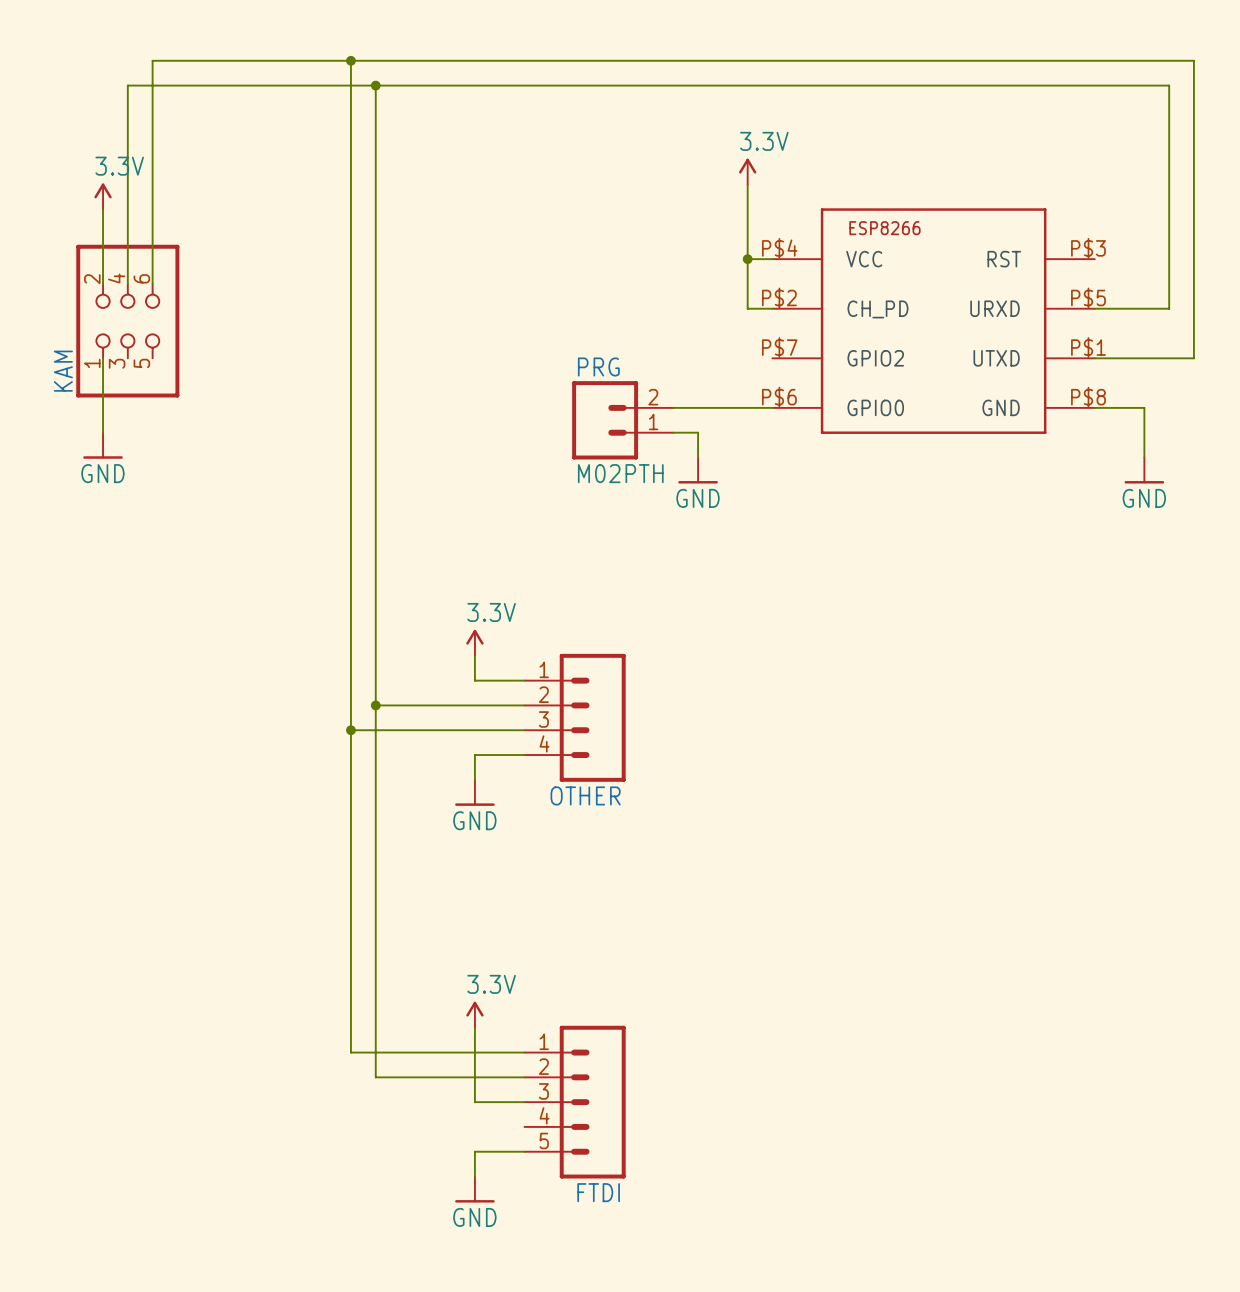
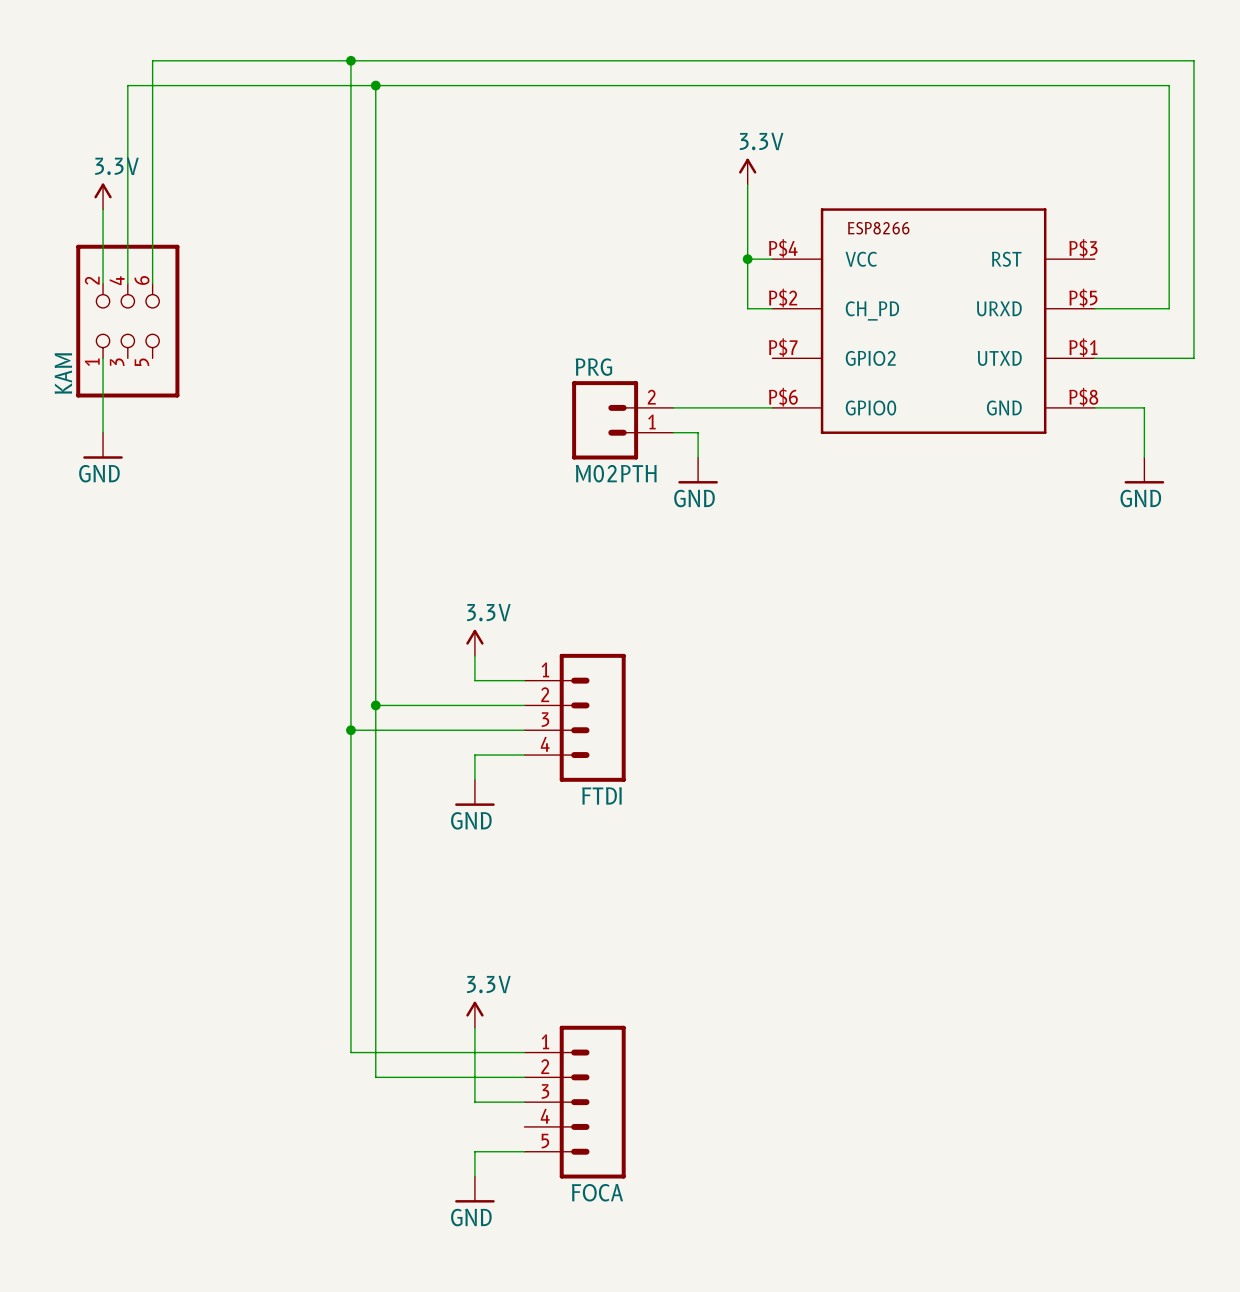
OTHER name: OTHER (585, 795) -> FTDI (601, 795)
FTDI name: FTDI (598, 1192) -> FOCA (597, 1192)

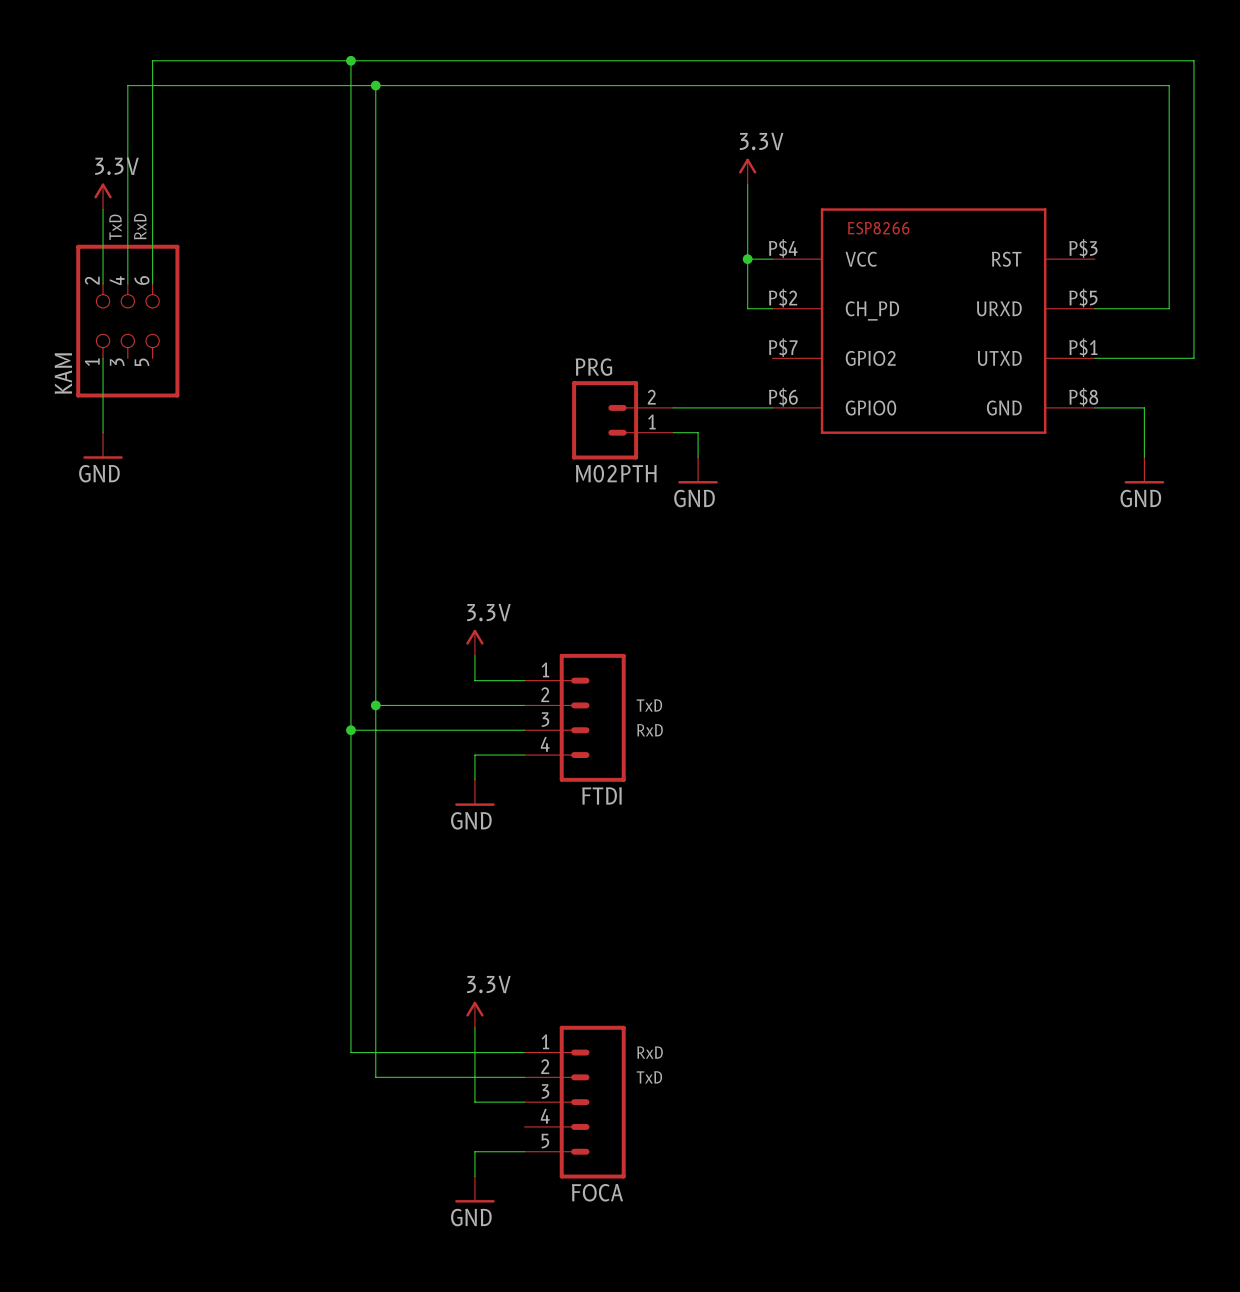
text: none -> RxD (140, 226)
text: none -> TxD (115, 227)
text: none -> TxD (649, 705)
text: none -> RxD (650, 730)
text: none -> RxD (650, 1052)
text: none -> TxD (649, 1077)

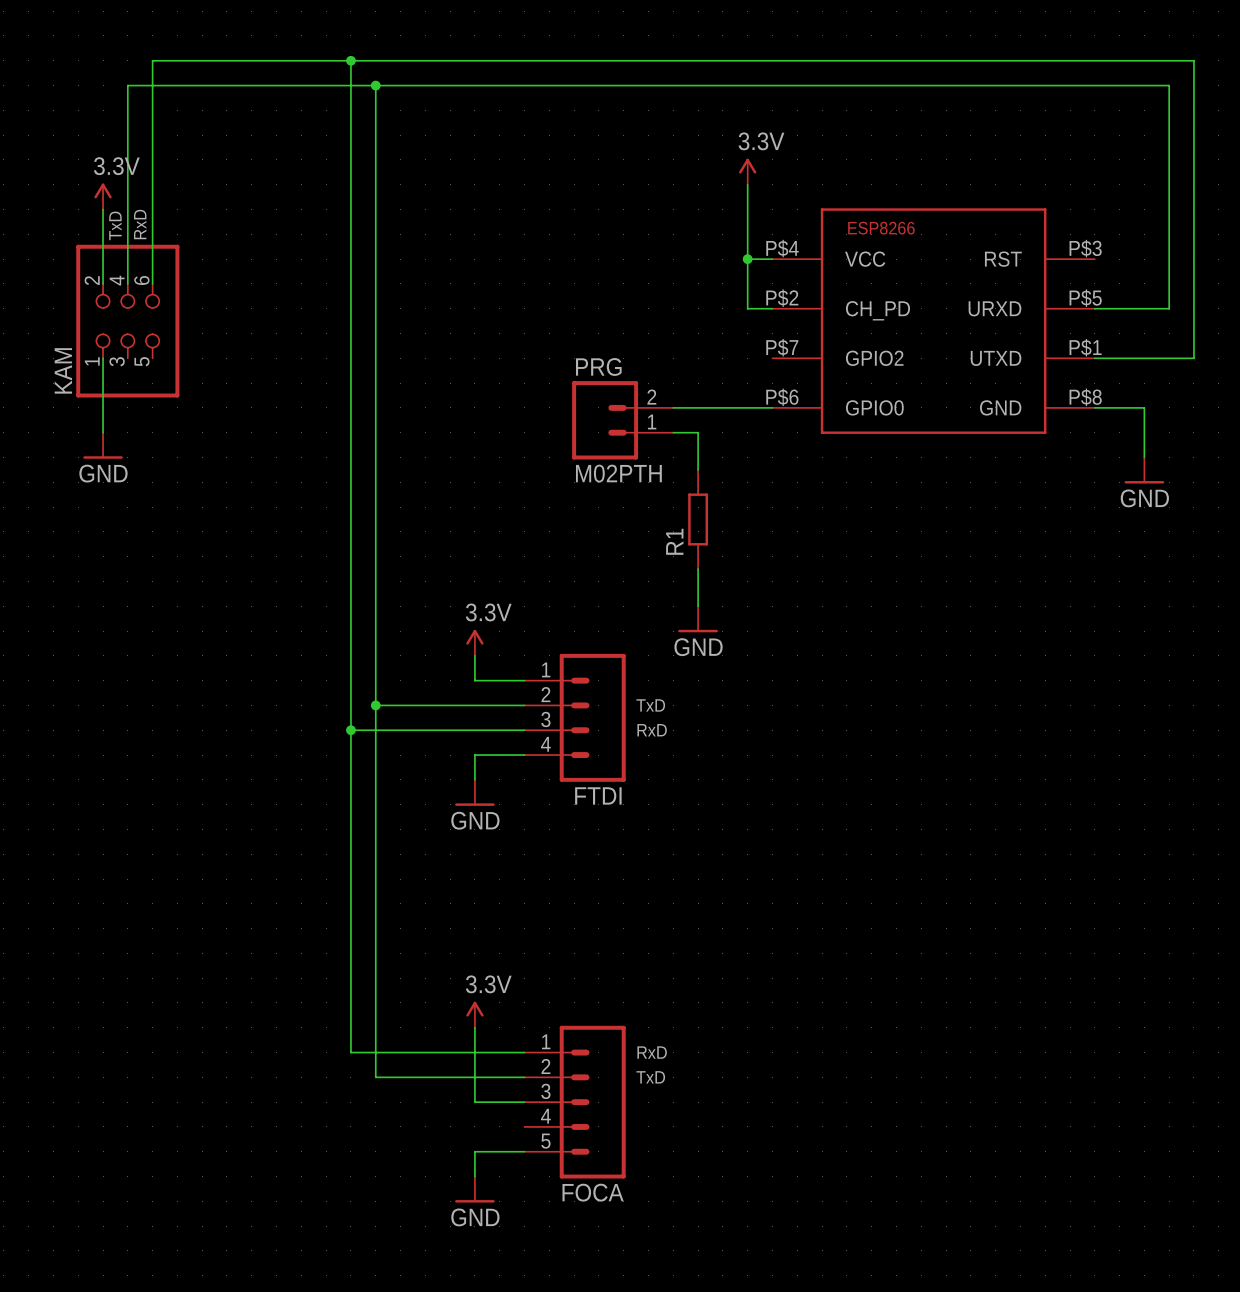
power symbol position: GND (698, 470) -> GND (698, 619)
R1: none -> (698, 519)
wire: none -> (698, 569) (698, 606)

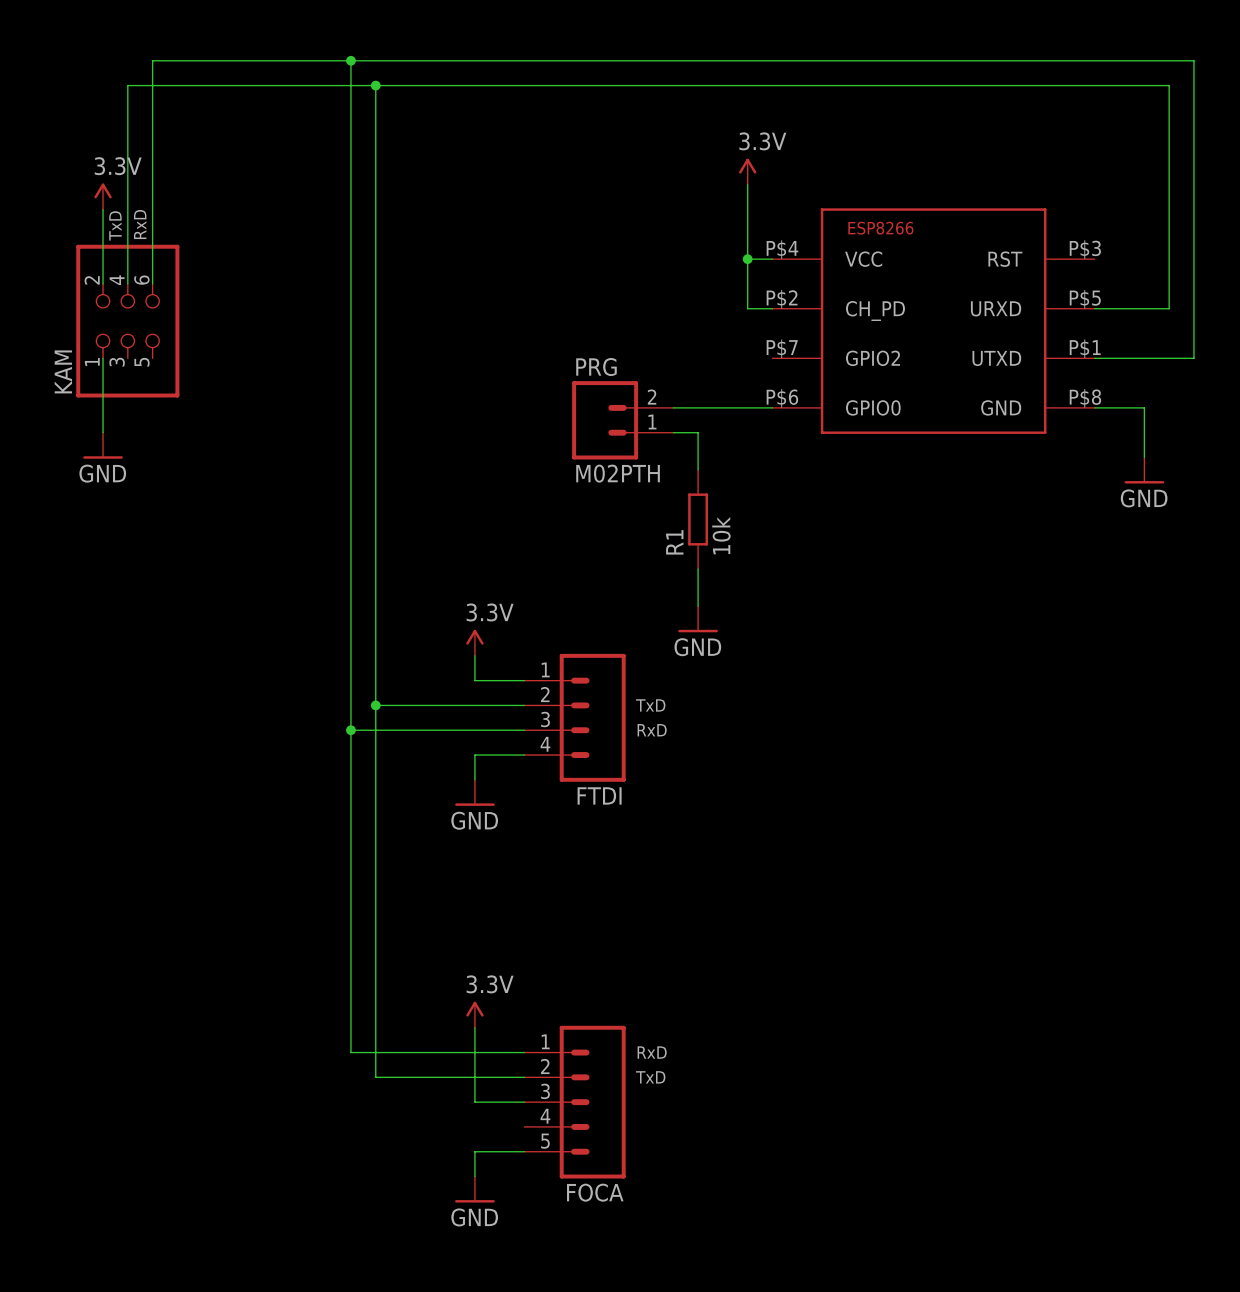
R1 value: none -> 10k (721, 535)

